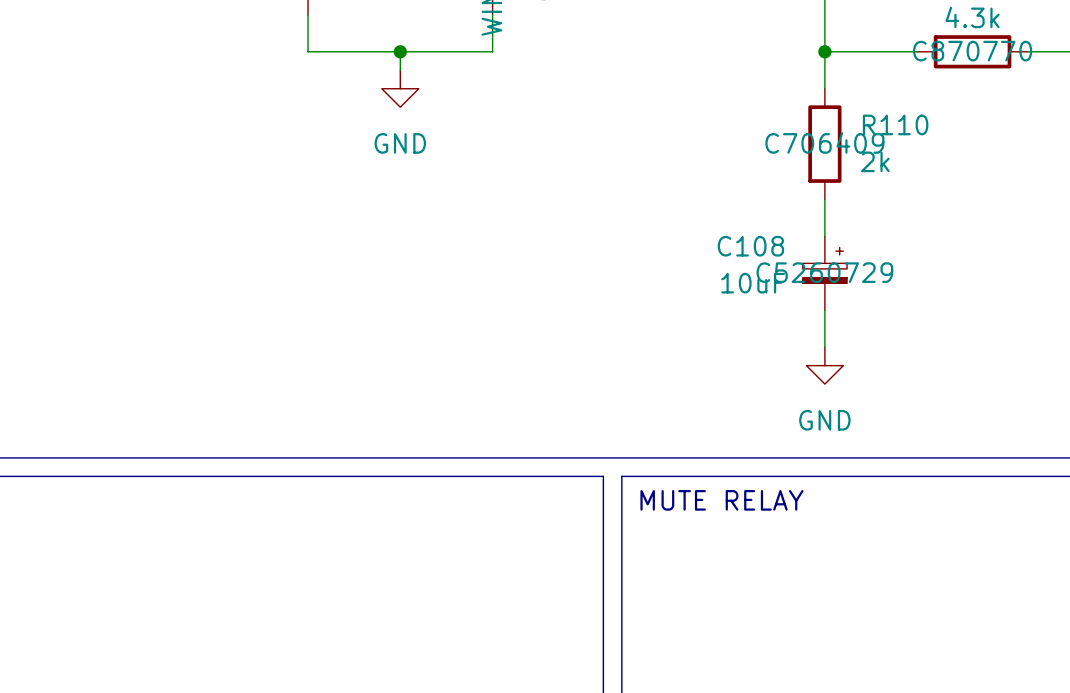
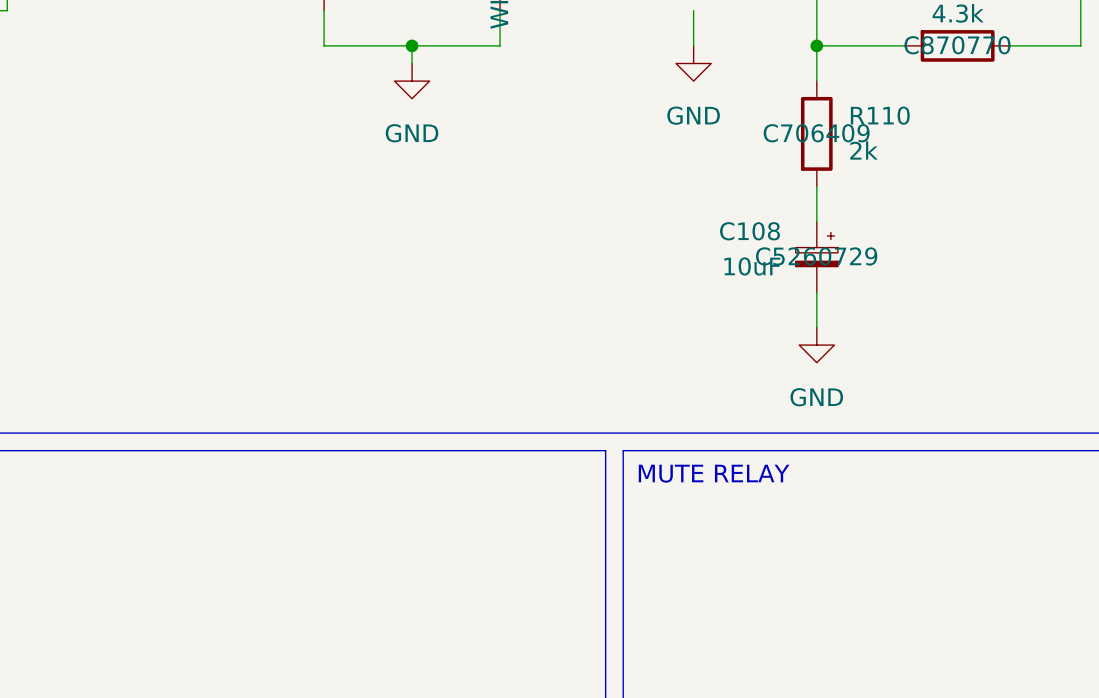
wire: none -> (693, 10) (693, 45)
power symbol: none -> GND (693, 63)

